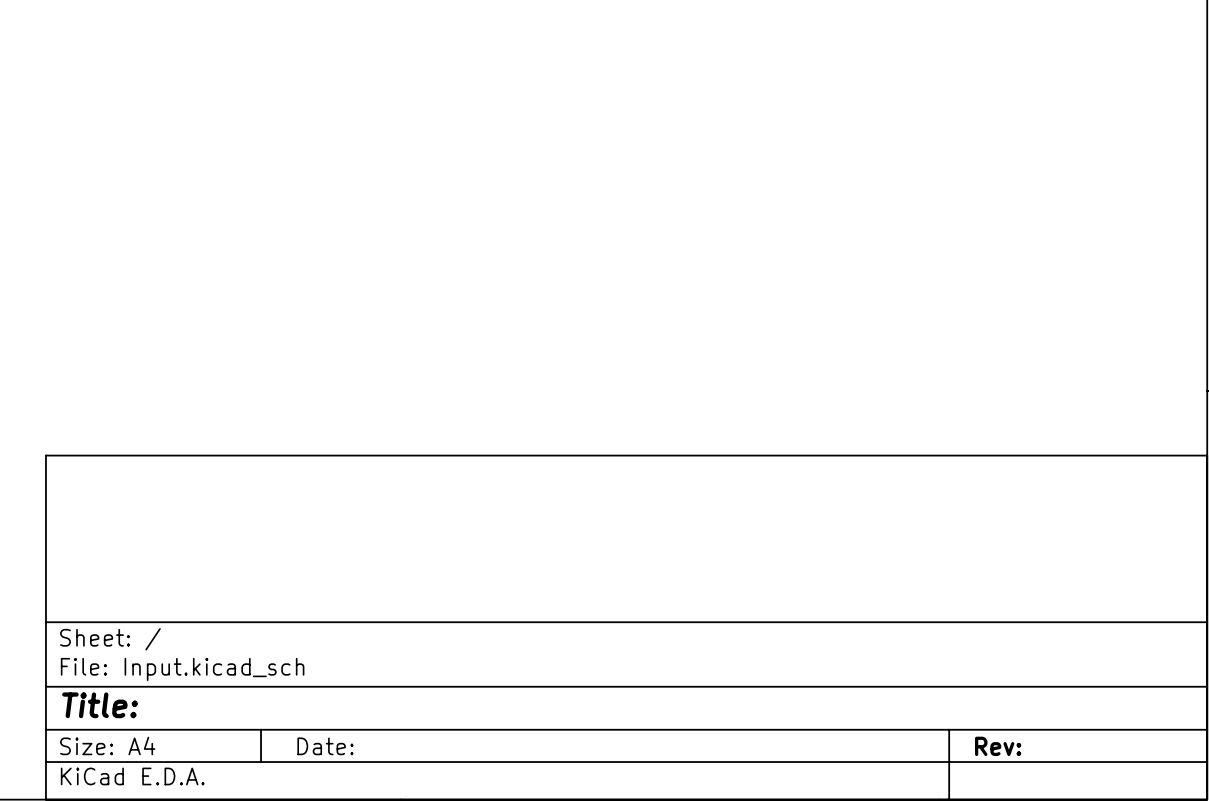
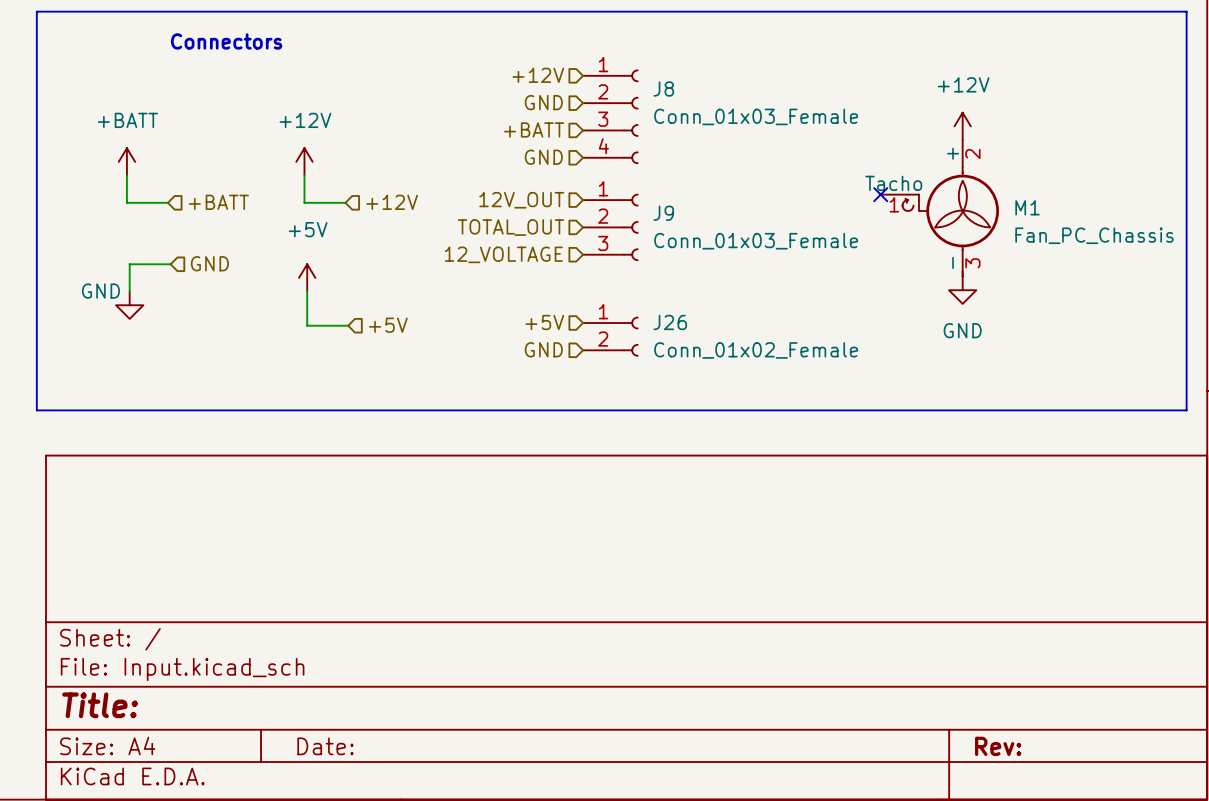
line: none -> (36, 11) (36, 410) (1186, 410) (1186, 11) (36, 11)
text: none -> Connectors (226, 41)
hierarchical label: none -> +12V (538, 75)
hierarchical label: none -> GND (543, 102)
J8: none -> Conn_01x03_Female (610, 116)
power symbol: none -> +12V (962, 126)
hierarchical label: none -> +BATT (534, 129)
hierarchical label: none -> GND (543, 157)
power symbol: none -> +BATT (126, 161)
power symbol: none -> +12V (304, 161)
wire: none -> (126, 175) (126, 202) (167, 202)
wire: none -> (304, 175) (304, 202) (345, 202)
no-connect mark: none -> (880, 194)
hierarchical label: none -> 12V_OUT (521, 200)
hierarchical label: none -> +BATT (218, 202)
hierarchical label: none -> +12V (392, 202)
M1: none -> Fan_PC_Chassis (939, 208)
hierarchical label: none -> TOTAL_OUT (510, 227)
J9: none -> Conn_01x03_Female (610, 227)
hierarchical label: none -> 12_VOLTAGE (503, 254)
hierarchical label: none -> GND (209, 263)
wire: none -> (170, 264) (129, 264) (129, 291)
power symbol: none -> +5V (307, 277)
power symbol: none -> GND (962, 290)
wire: none -> (307, 291) (307, 325) (348, 325)
power symbol: none -> GND (129, 305)
hierarchical label: none -> +5V (544, 322)
hierarchical label: none -> +5V (388, 325)
J26: none -> Conn_01x02_Female (610, 336)
hierarchical label: none -> GND (543, 349)

